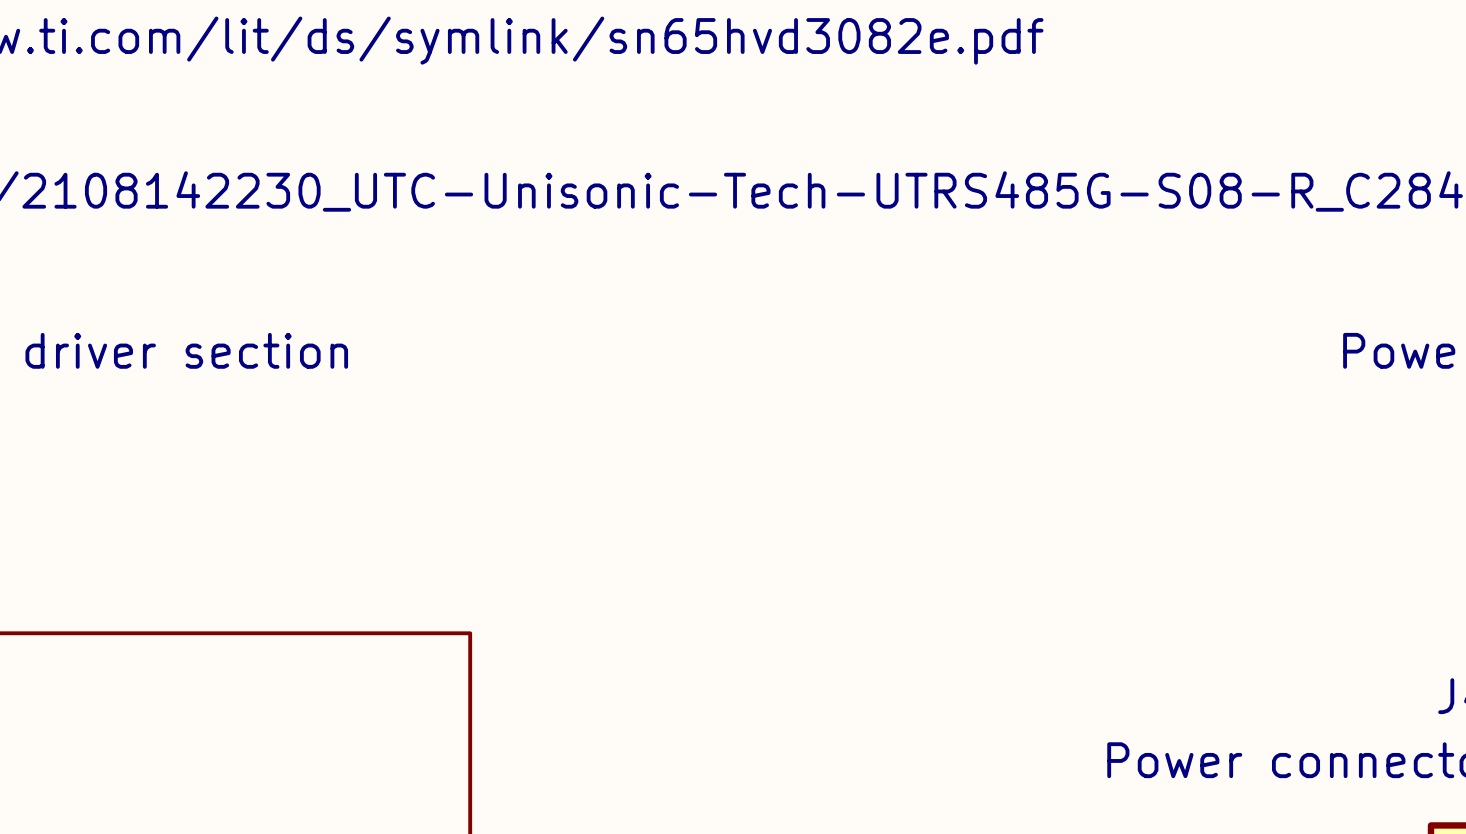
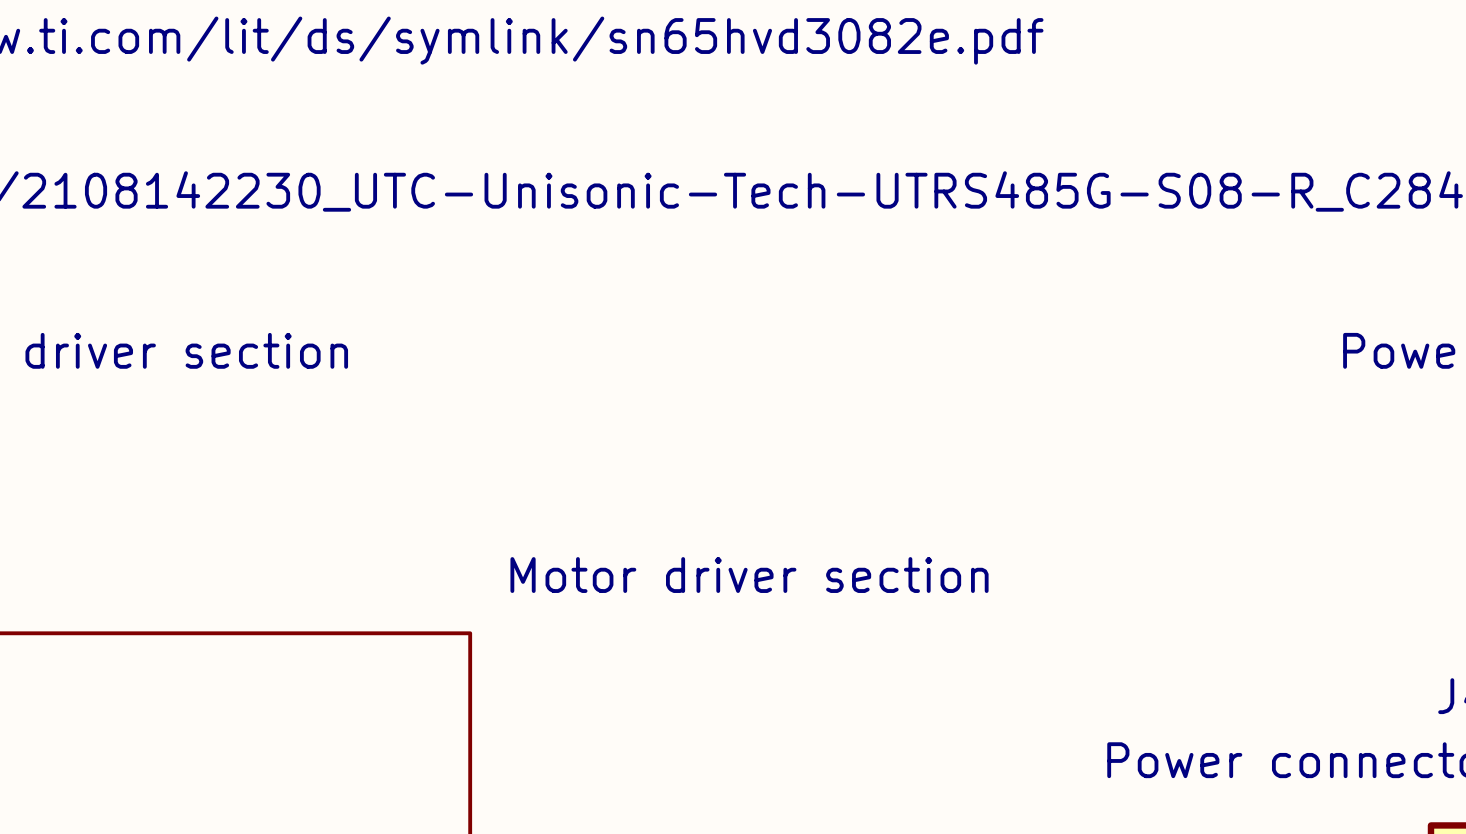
text: none -> Motor driver section (749, 575)

